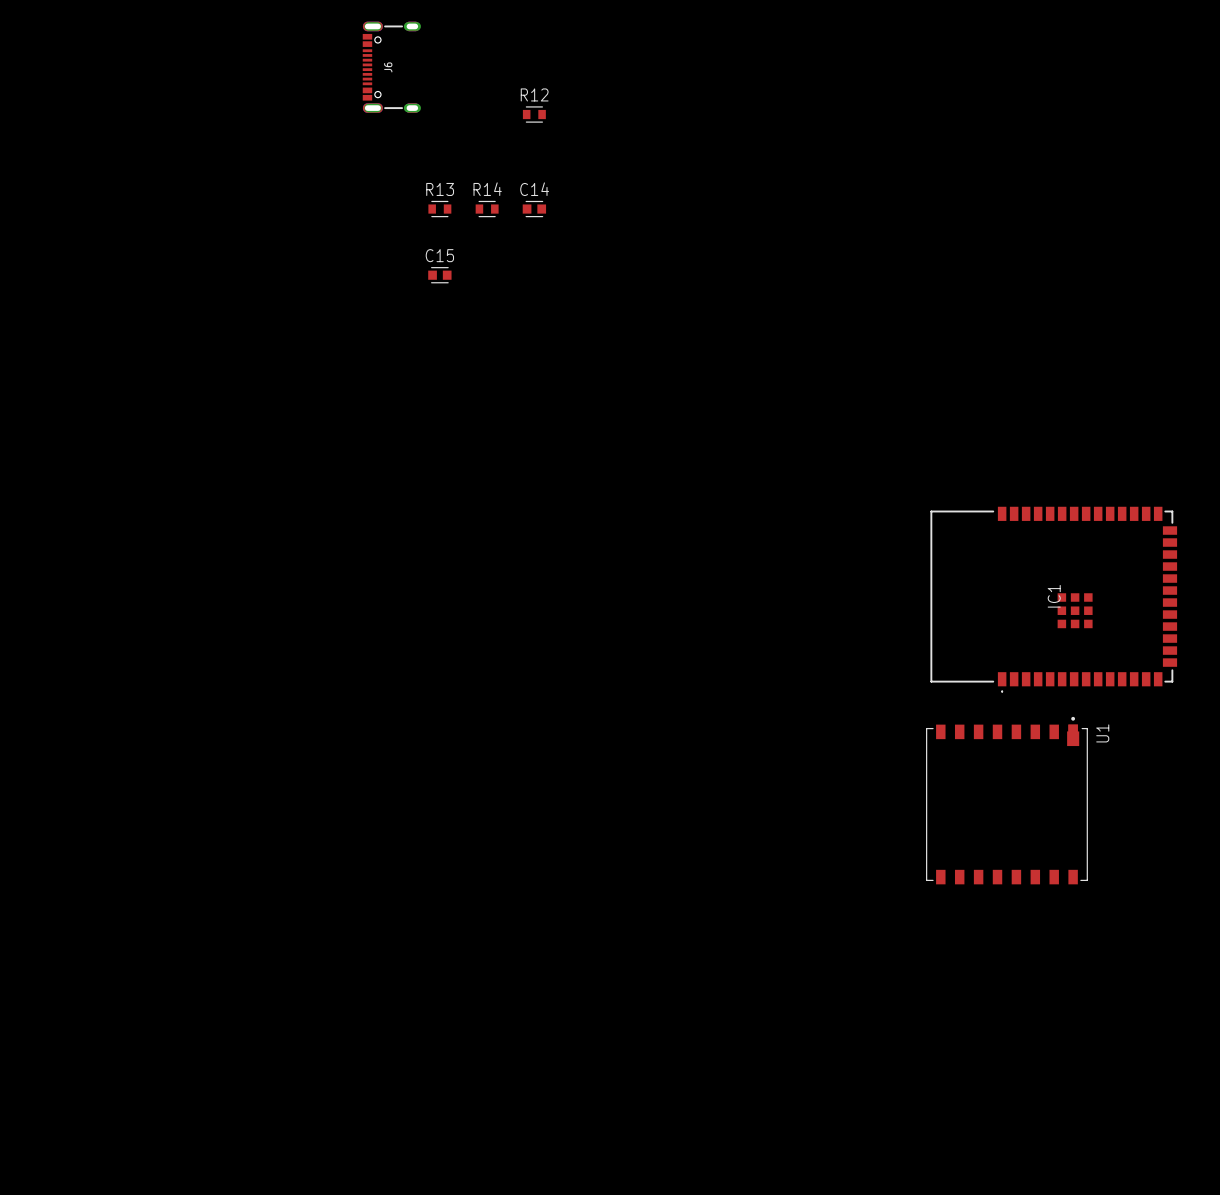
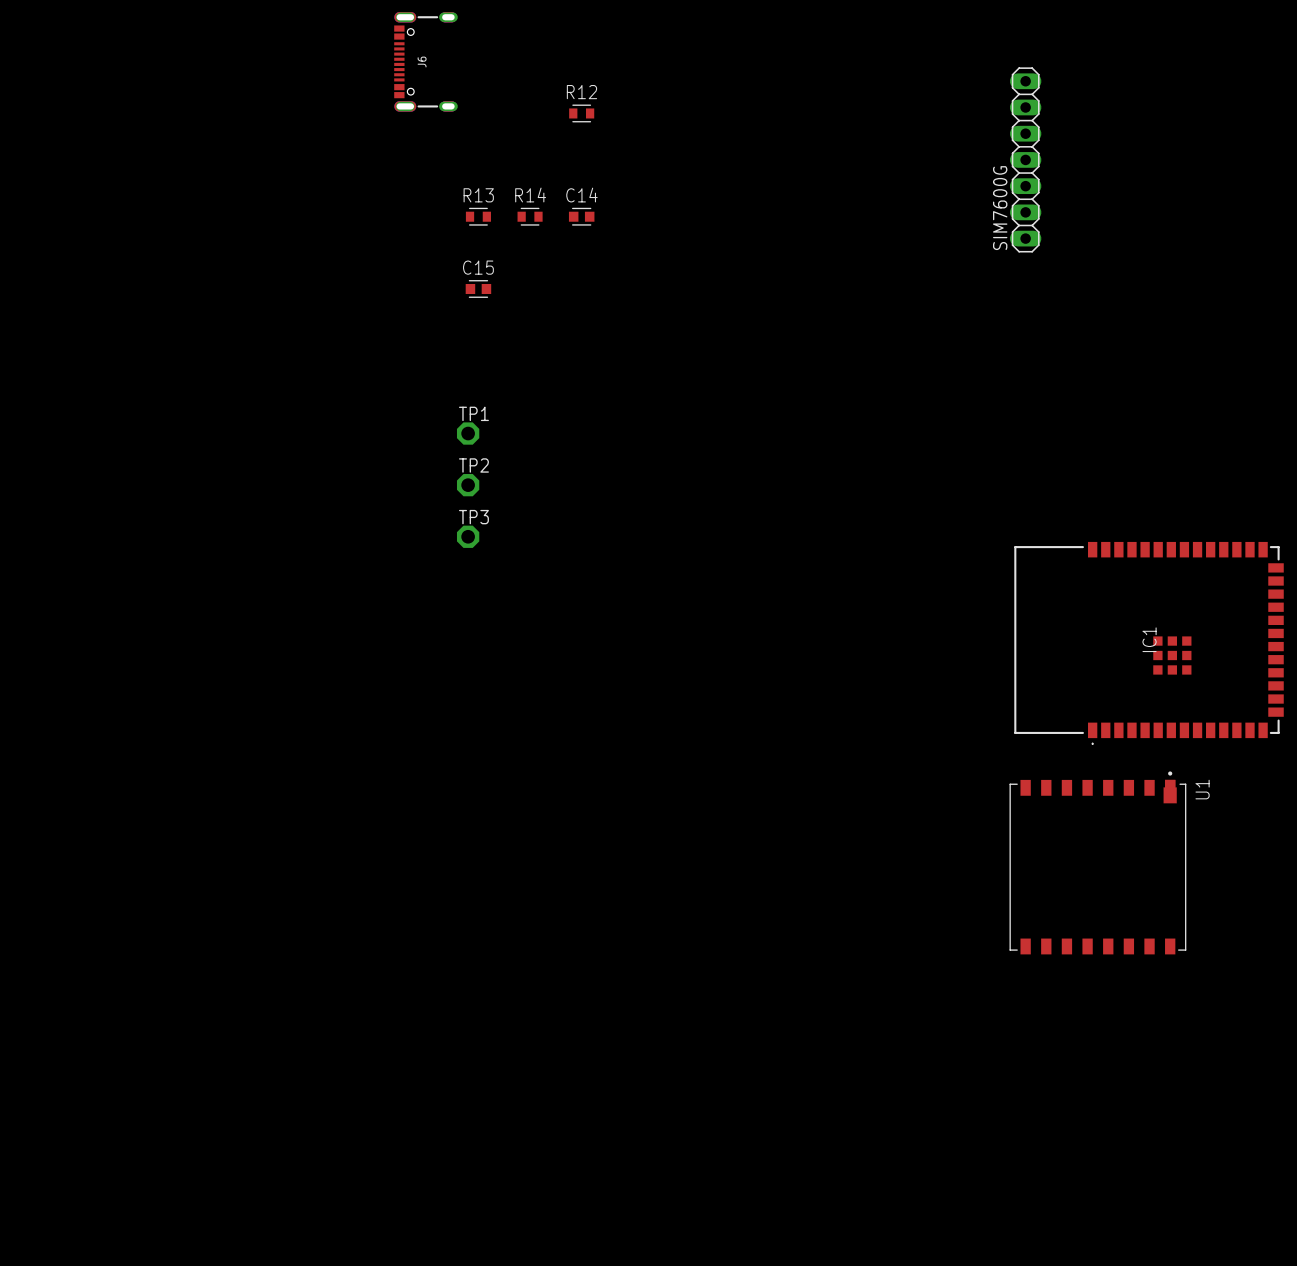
SIM7600G: none -> (1025, 159)
TP1: none -> (468, 433)
TP2: none -> (468, 485)
TP3: none -> (468, 536)

